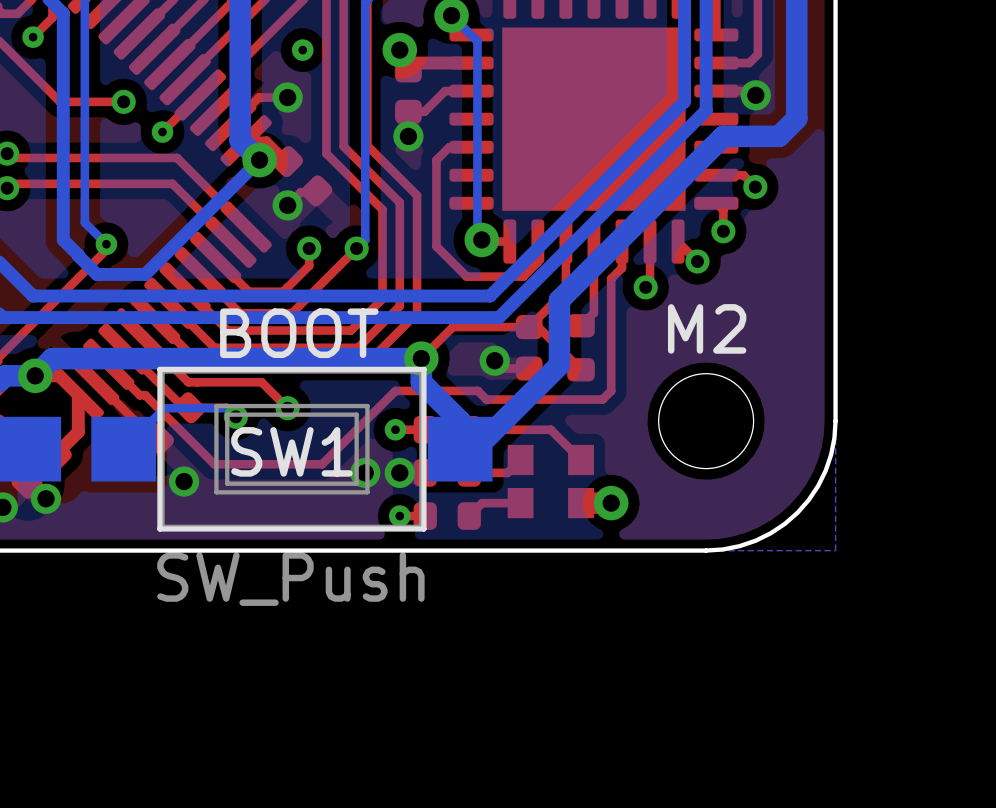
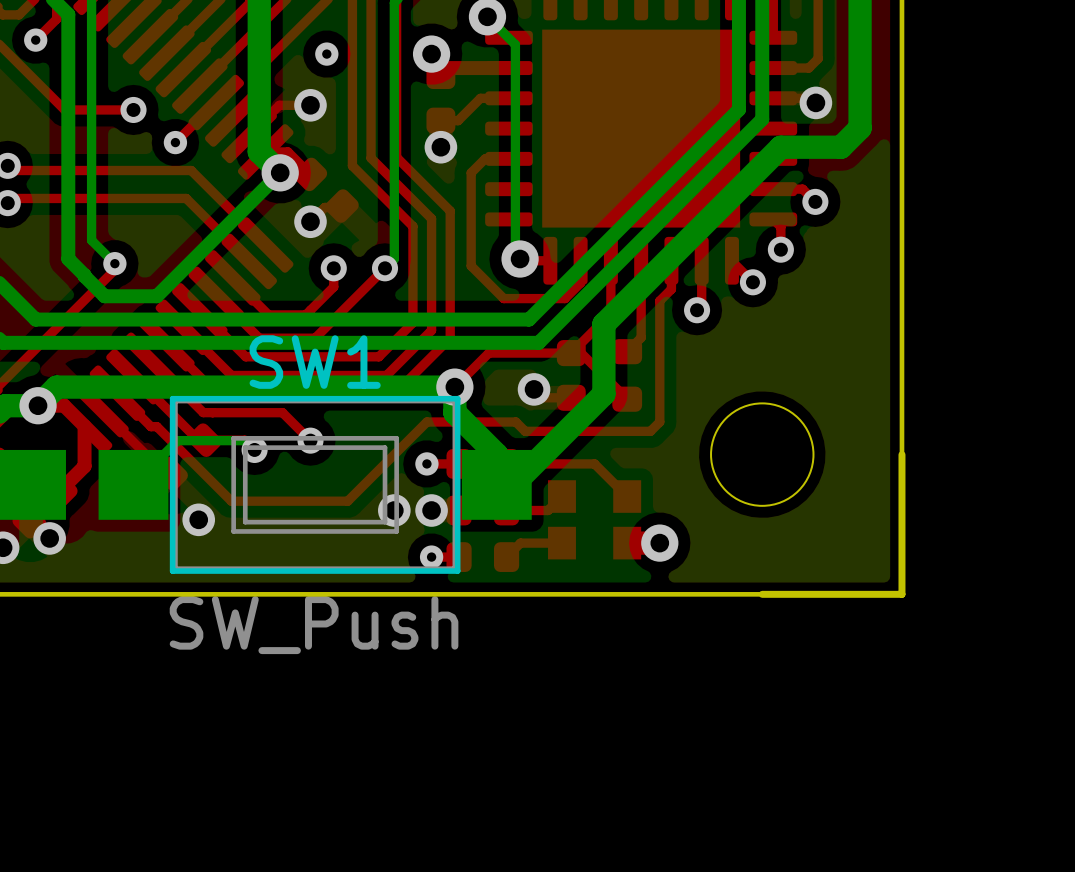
part text: M2 (707, 328) -> none
SW1 text: BOOT (299, 333) -> none
board edge: (835, 421) (834, 438) (825, 470) (818, 485) (797, 512) (770, 533) (755, 540) (723, 549) (706, 550) -> (901, 454) (901, 594) (762, 594)
SW1 name position: SW1 (291, 451) -> SW1 (315, 362)

